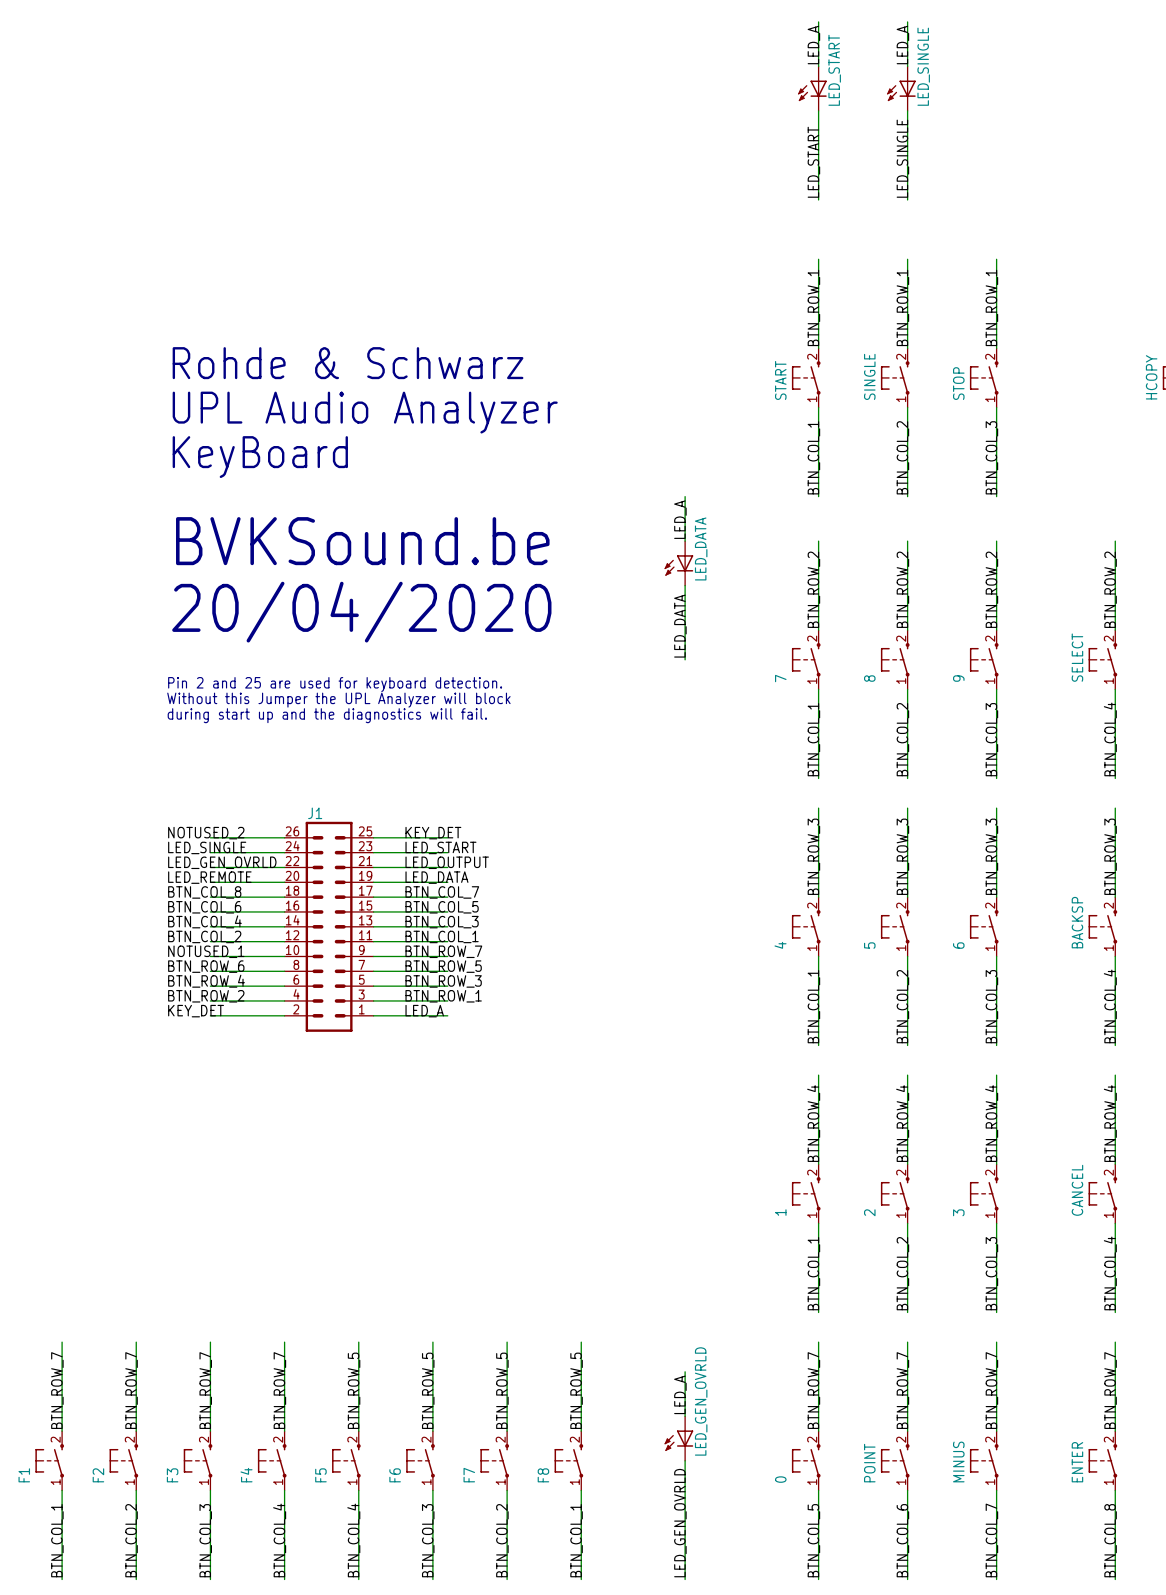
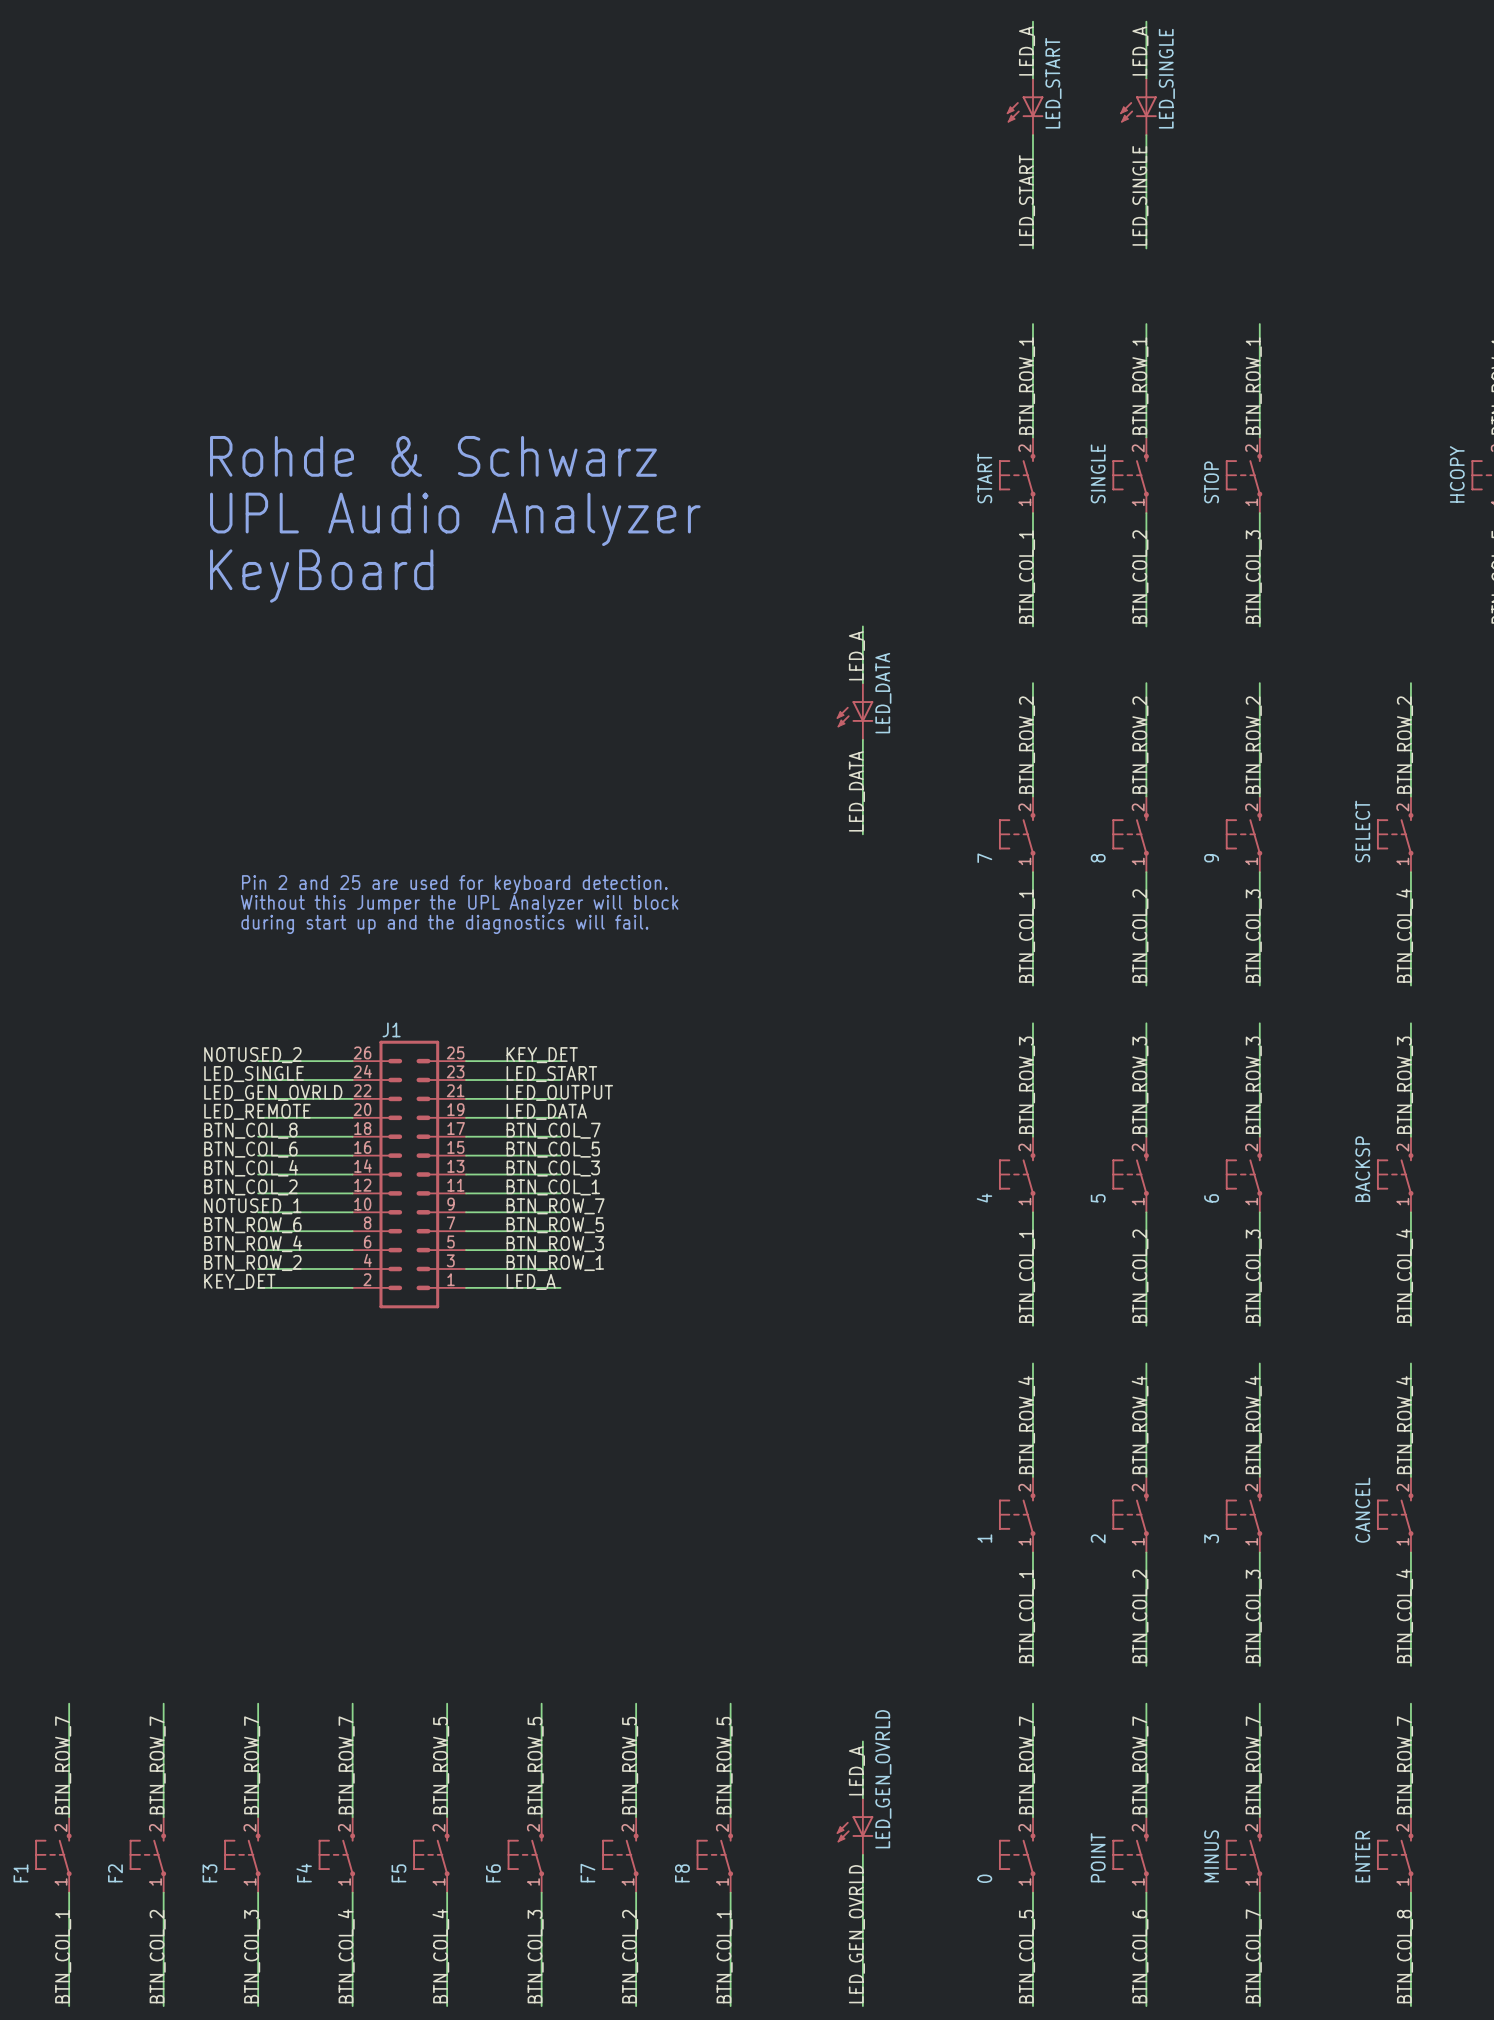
text: BVKSound.be (362, 541) -> none
text: 20/04/2020 (361, 612) -> none
text position: Pin 2 and 25 are used for keyboard detection. (335, 684) -> Pin 2 and 25 are used for keyboard detection. (454, 884)
text position: Without this Jumper the UPL Analyzer will block (338, 700) -> Without this Jumper the UPL Analyzer will block (459, 904)
text position: during start up and the diagnostics will fail. (327, 715) -> during start up and the diagnostics will fail. (444, 924)

